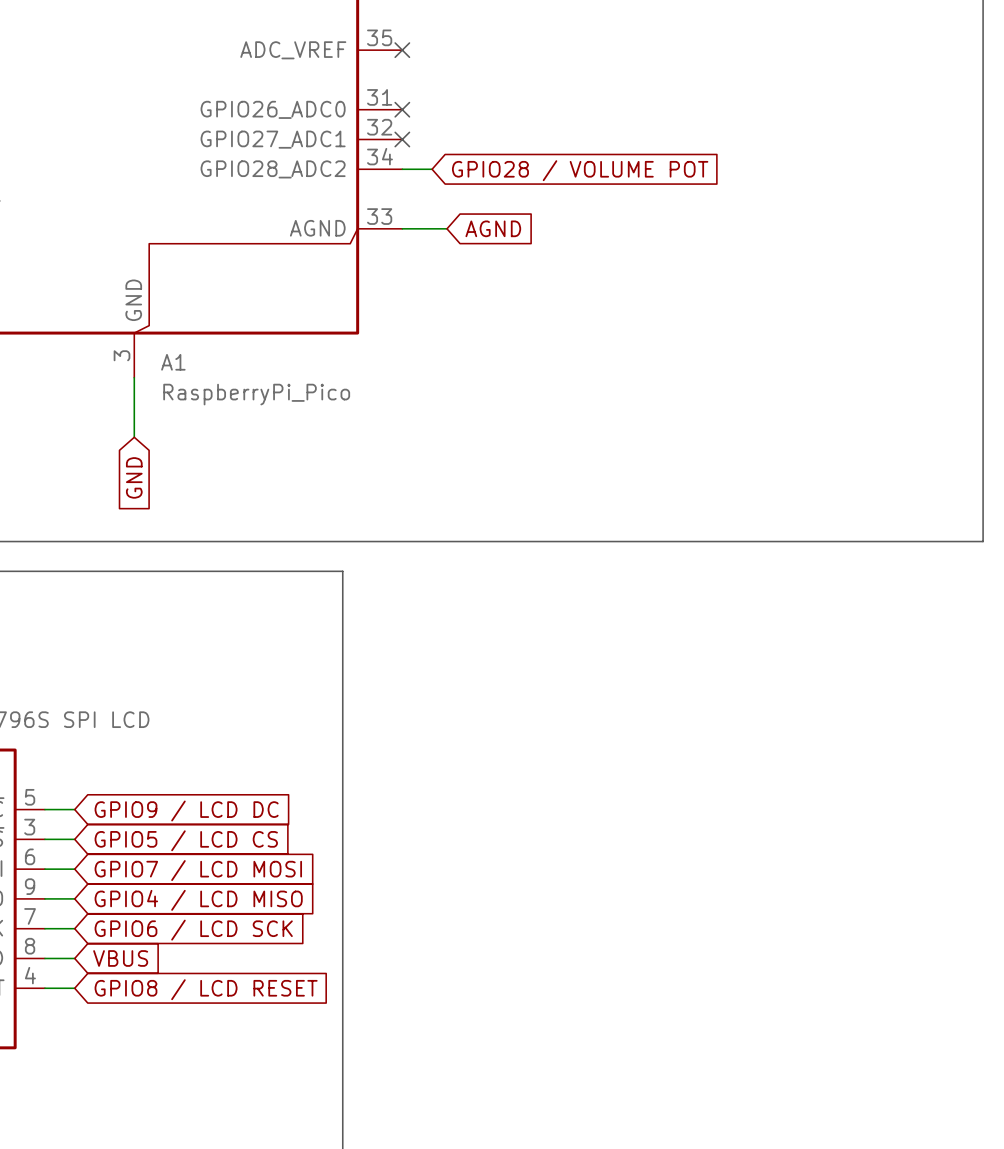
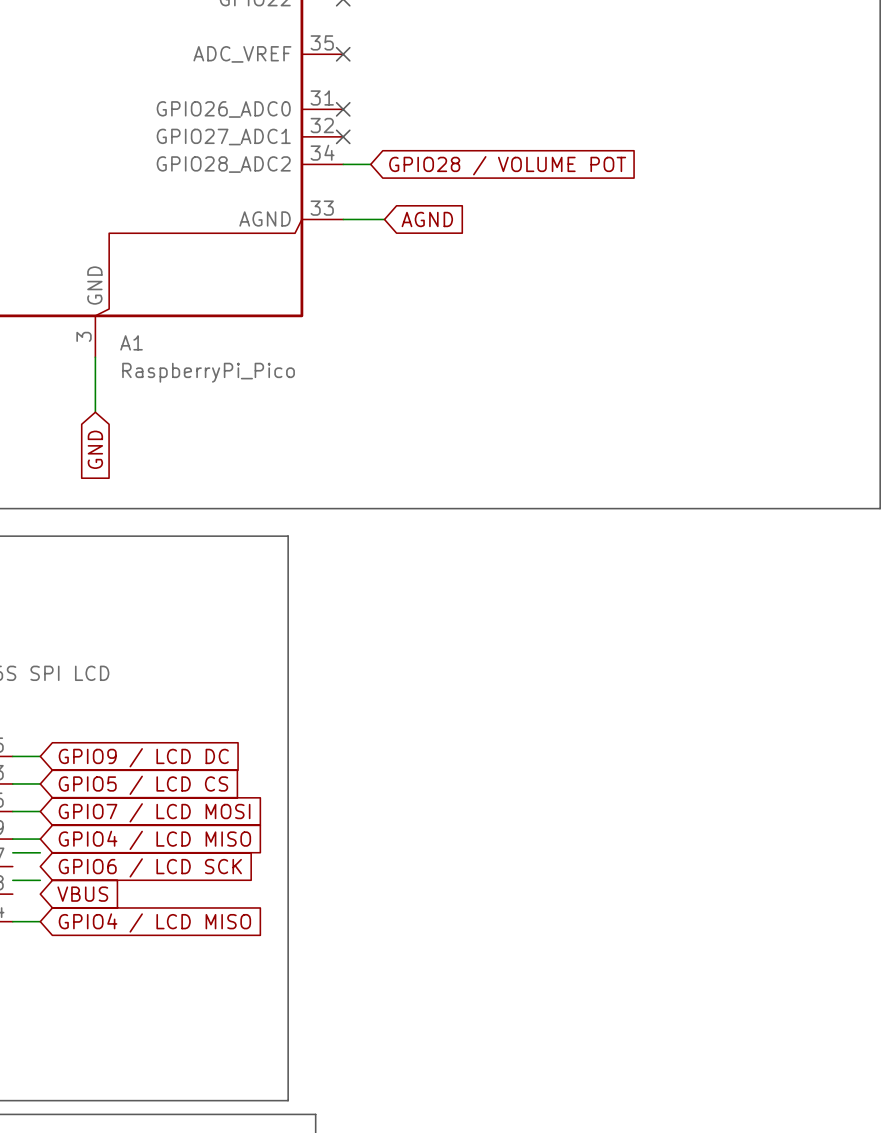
wire: (44, 928) (74, 928) -> (12, 852) (40, 852)
wire: (44, 958) (74, 958) -> (12, 880) (40, 880)
global label: GPIO8 / LCD RESET (206, 989) -> GPIO4 / LCD MISO (154, 922)

